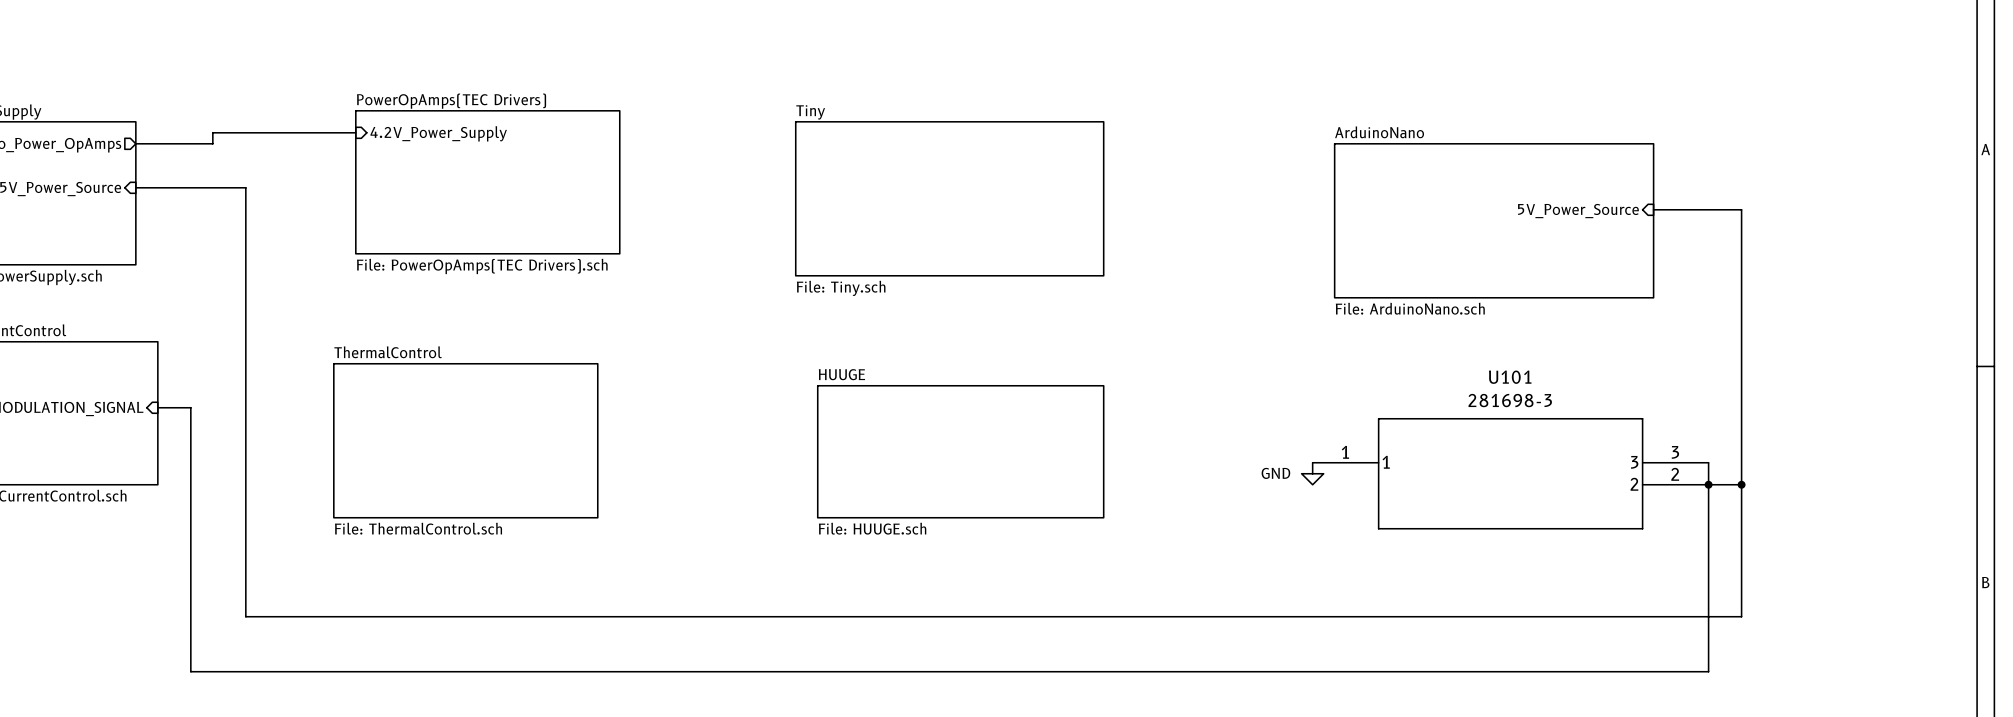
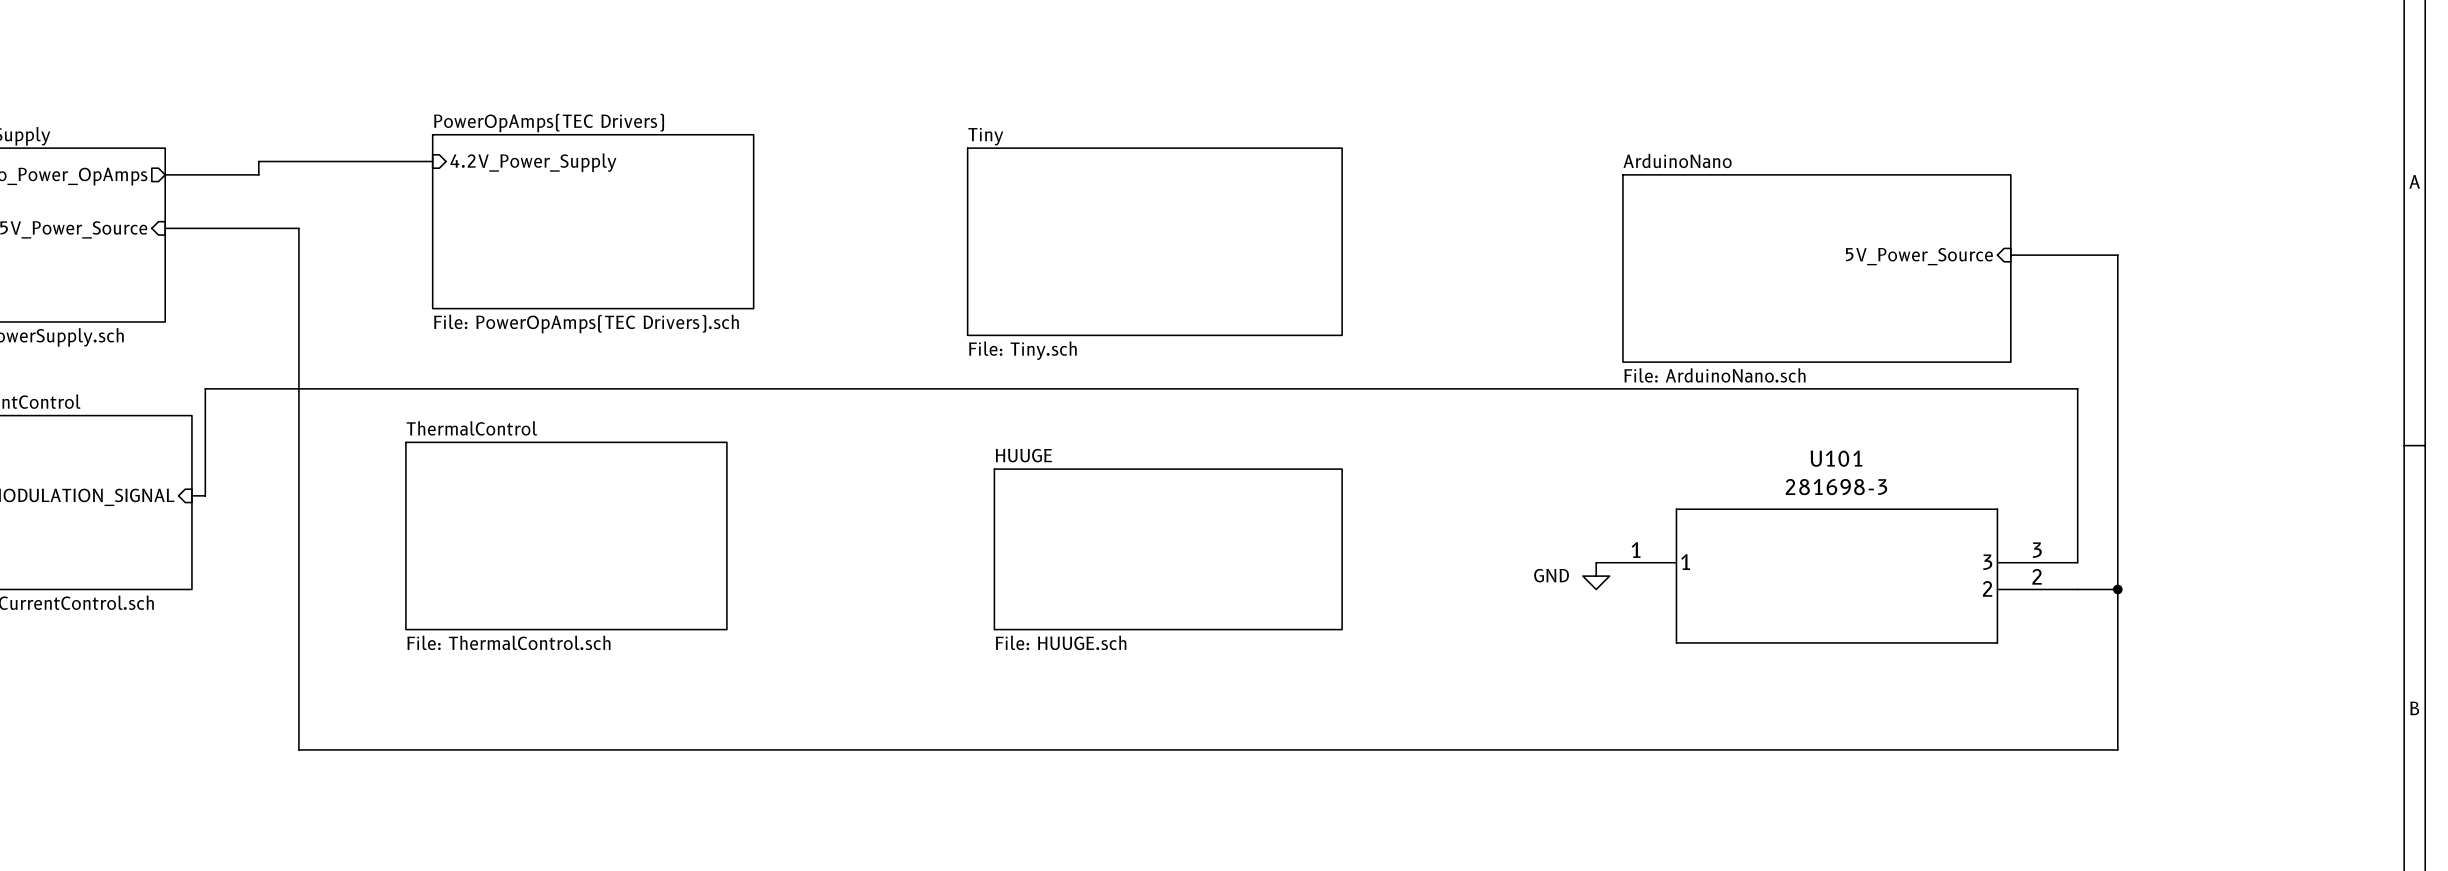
wire: (168, 407) (190, 407) (190, 671) (1708, 671) (1708, 462) -> (205, 495) (205, 388) (2077, 388) (2077, 562)
junction: (1708, 484) -> none

